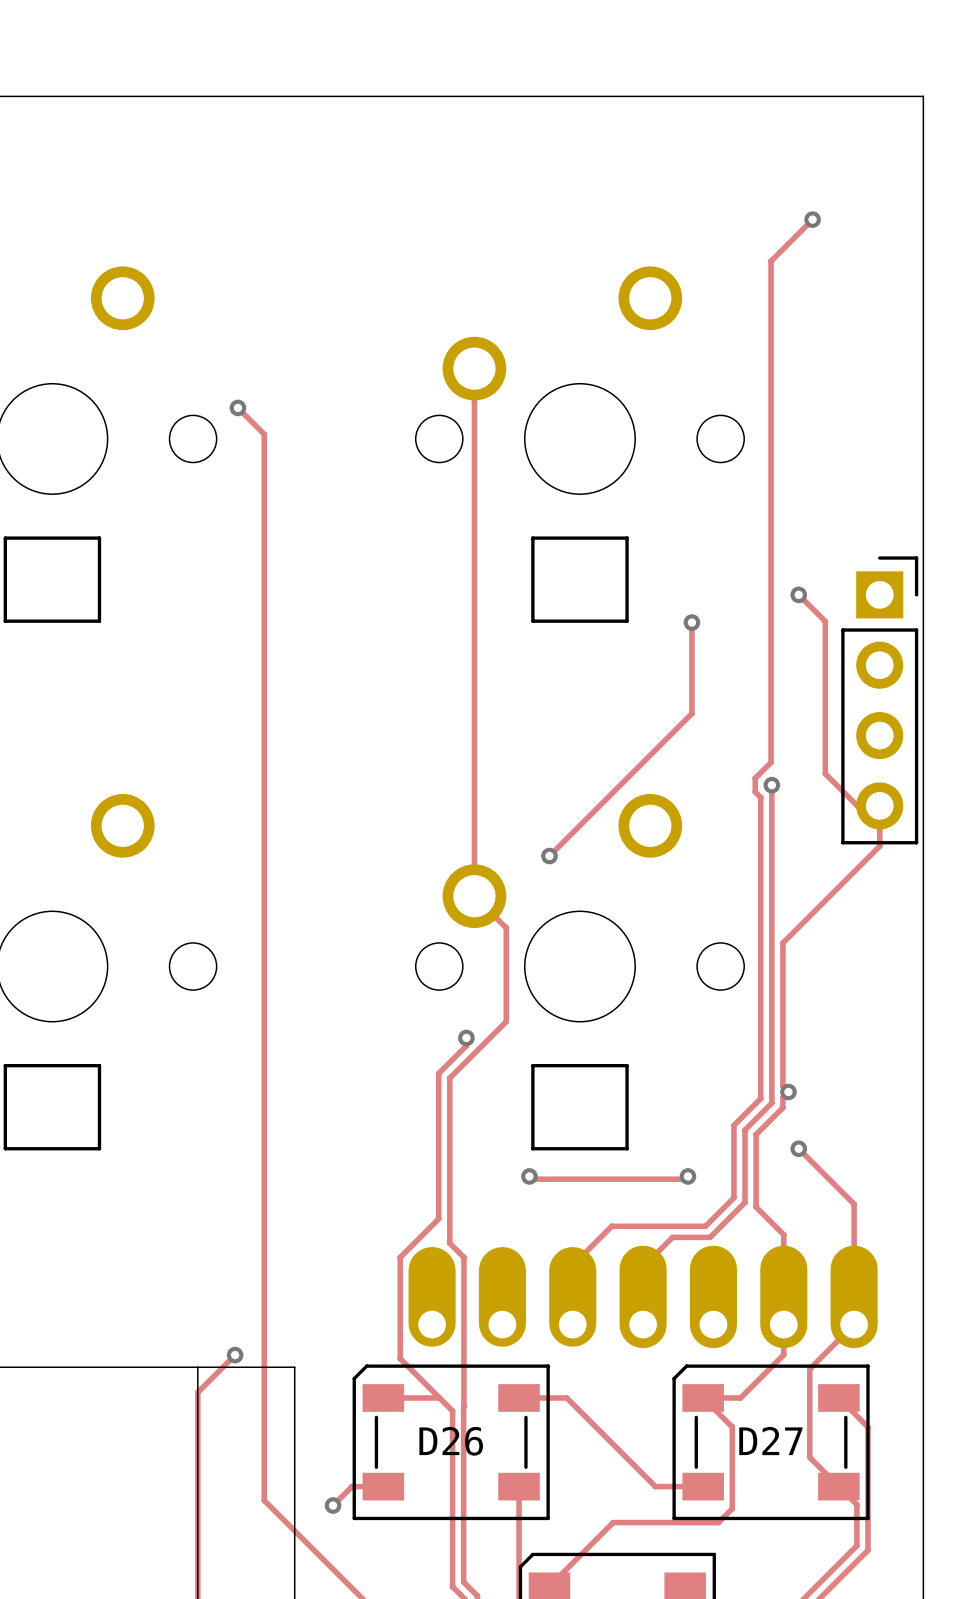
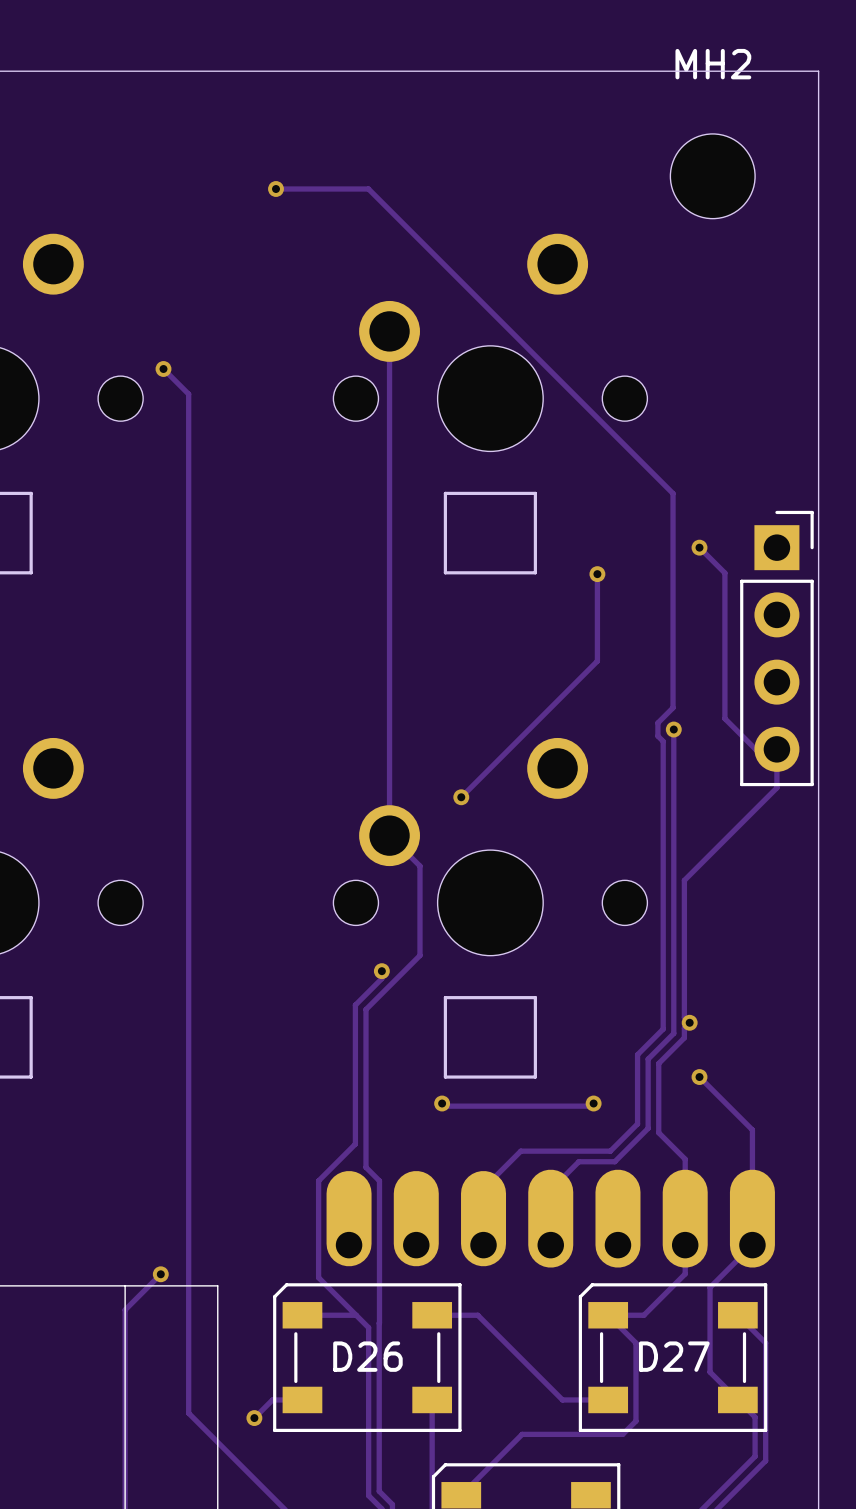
MH2: none -> (712, 176)
via: none -> (275, 189)
track: (812, 219) (771, 261) (771, 538) -> (275, 189) (368, 189) (673, 493)
via: (812, 219) -> none

